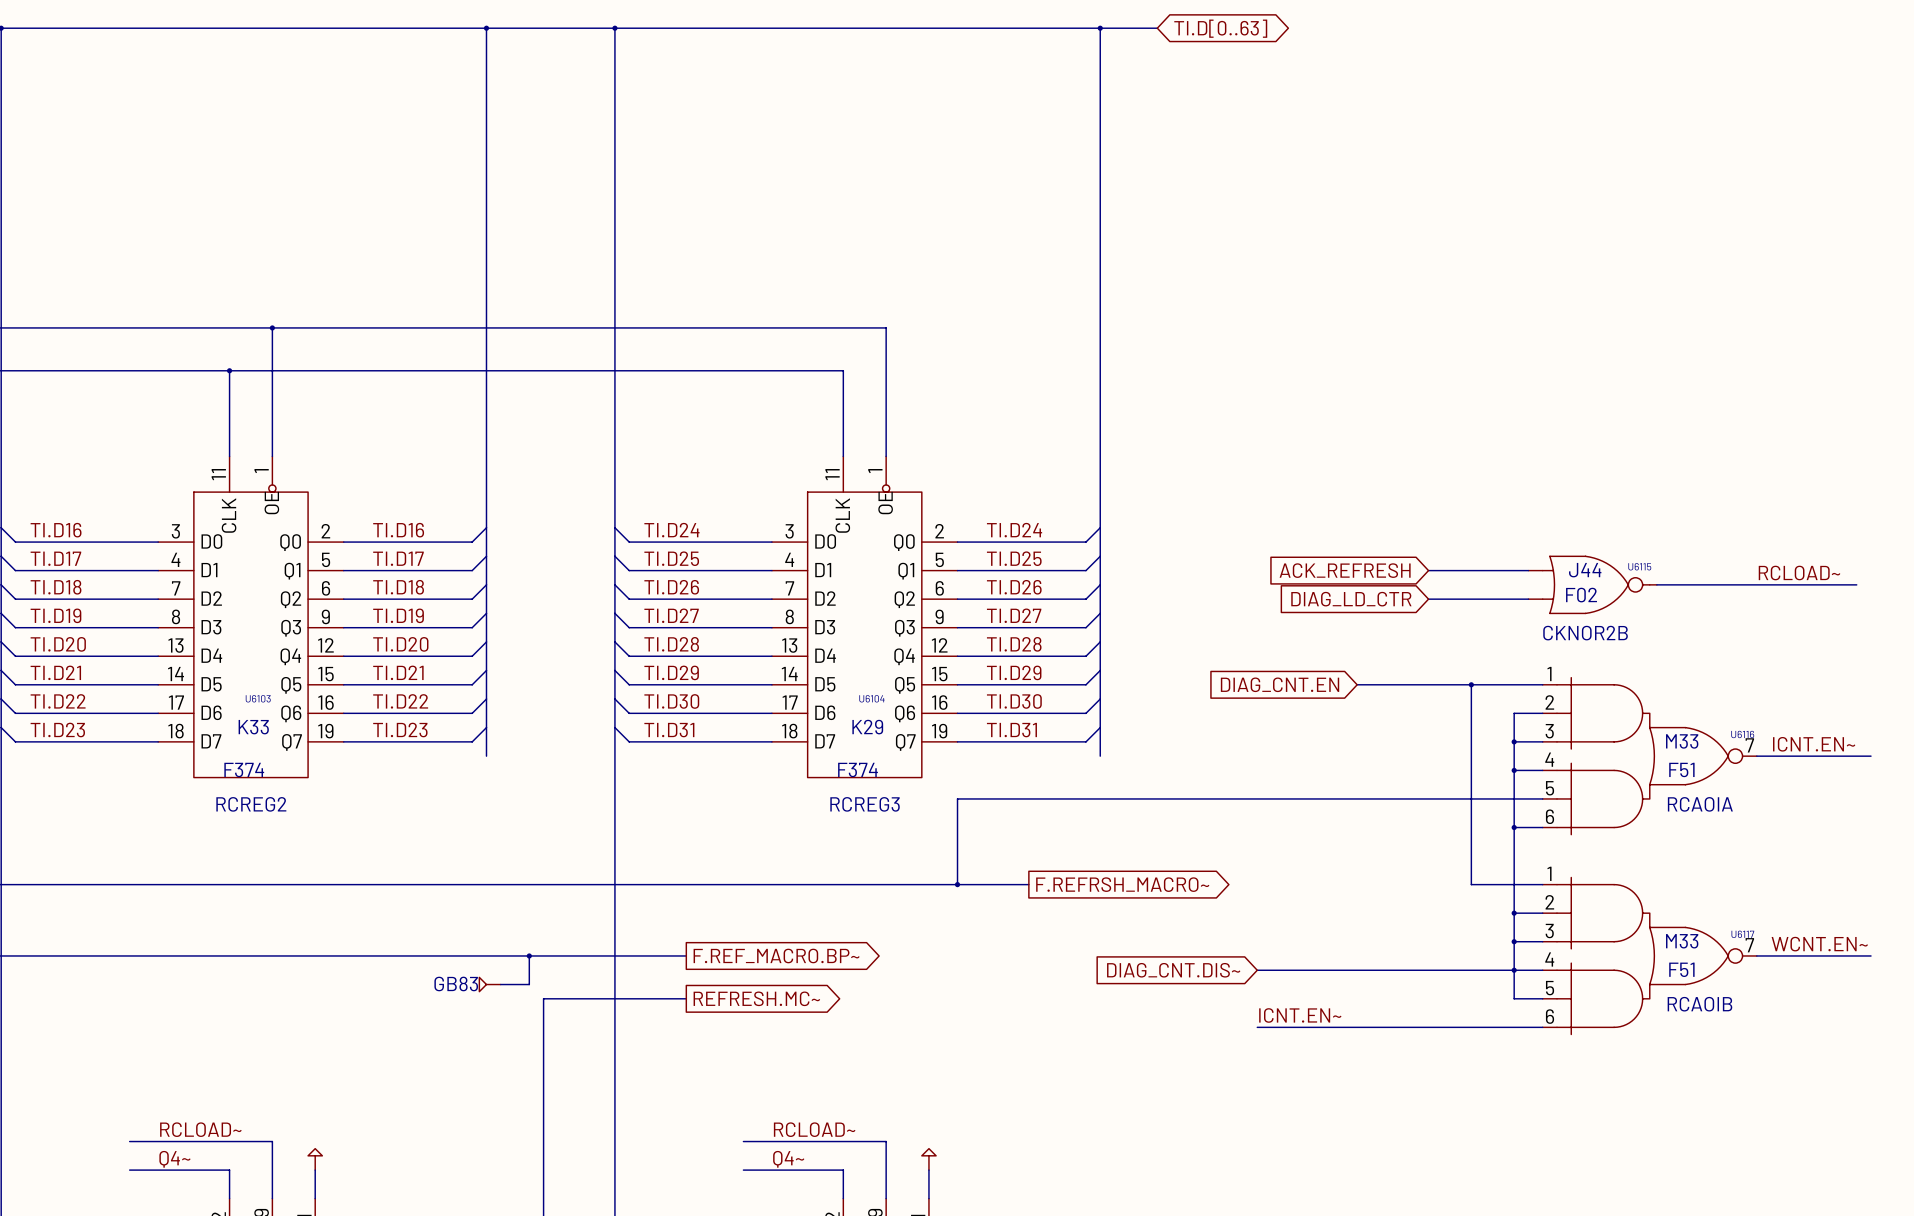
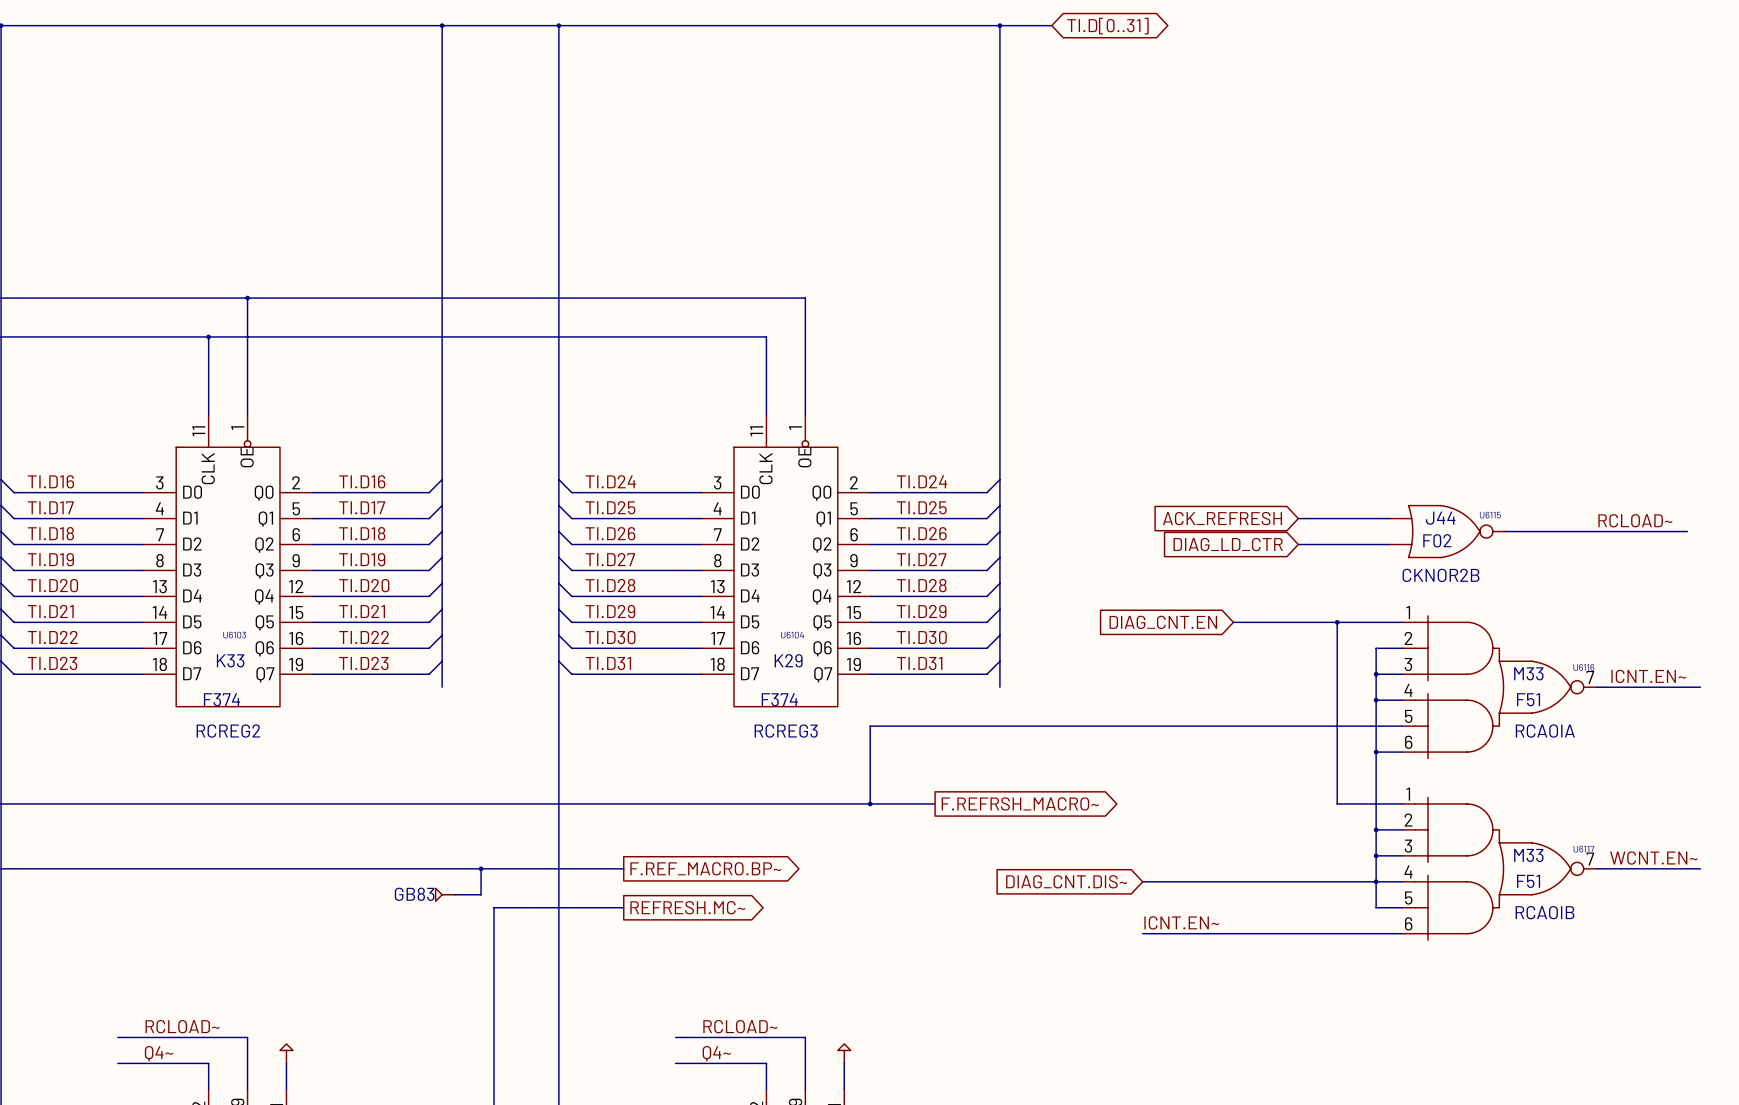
global label: TI.D[0..63] (1220, 28) -> TI.D[0..31] (1107, 26)

